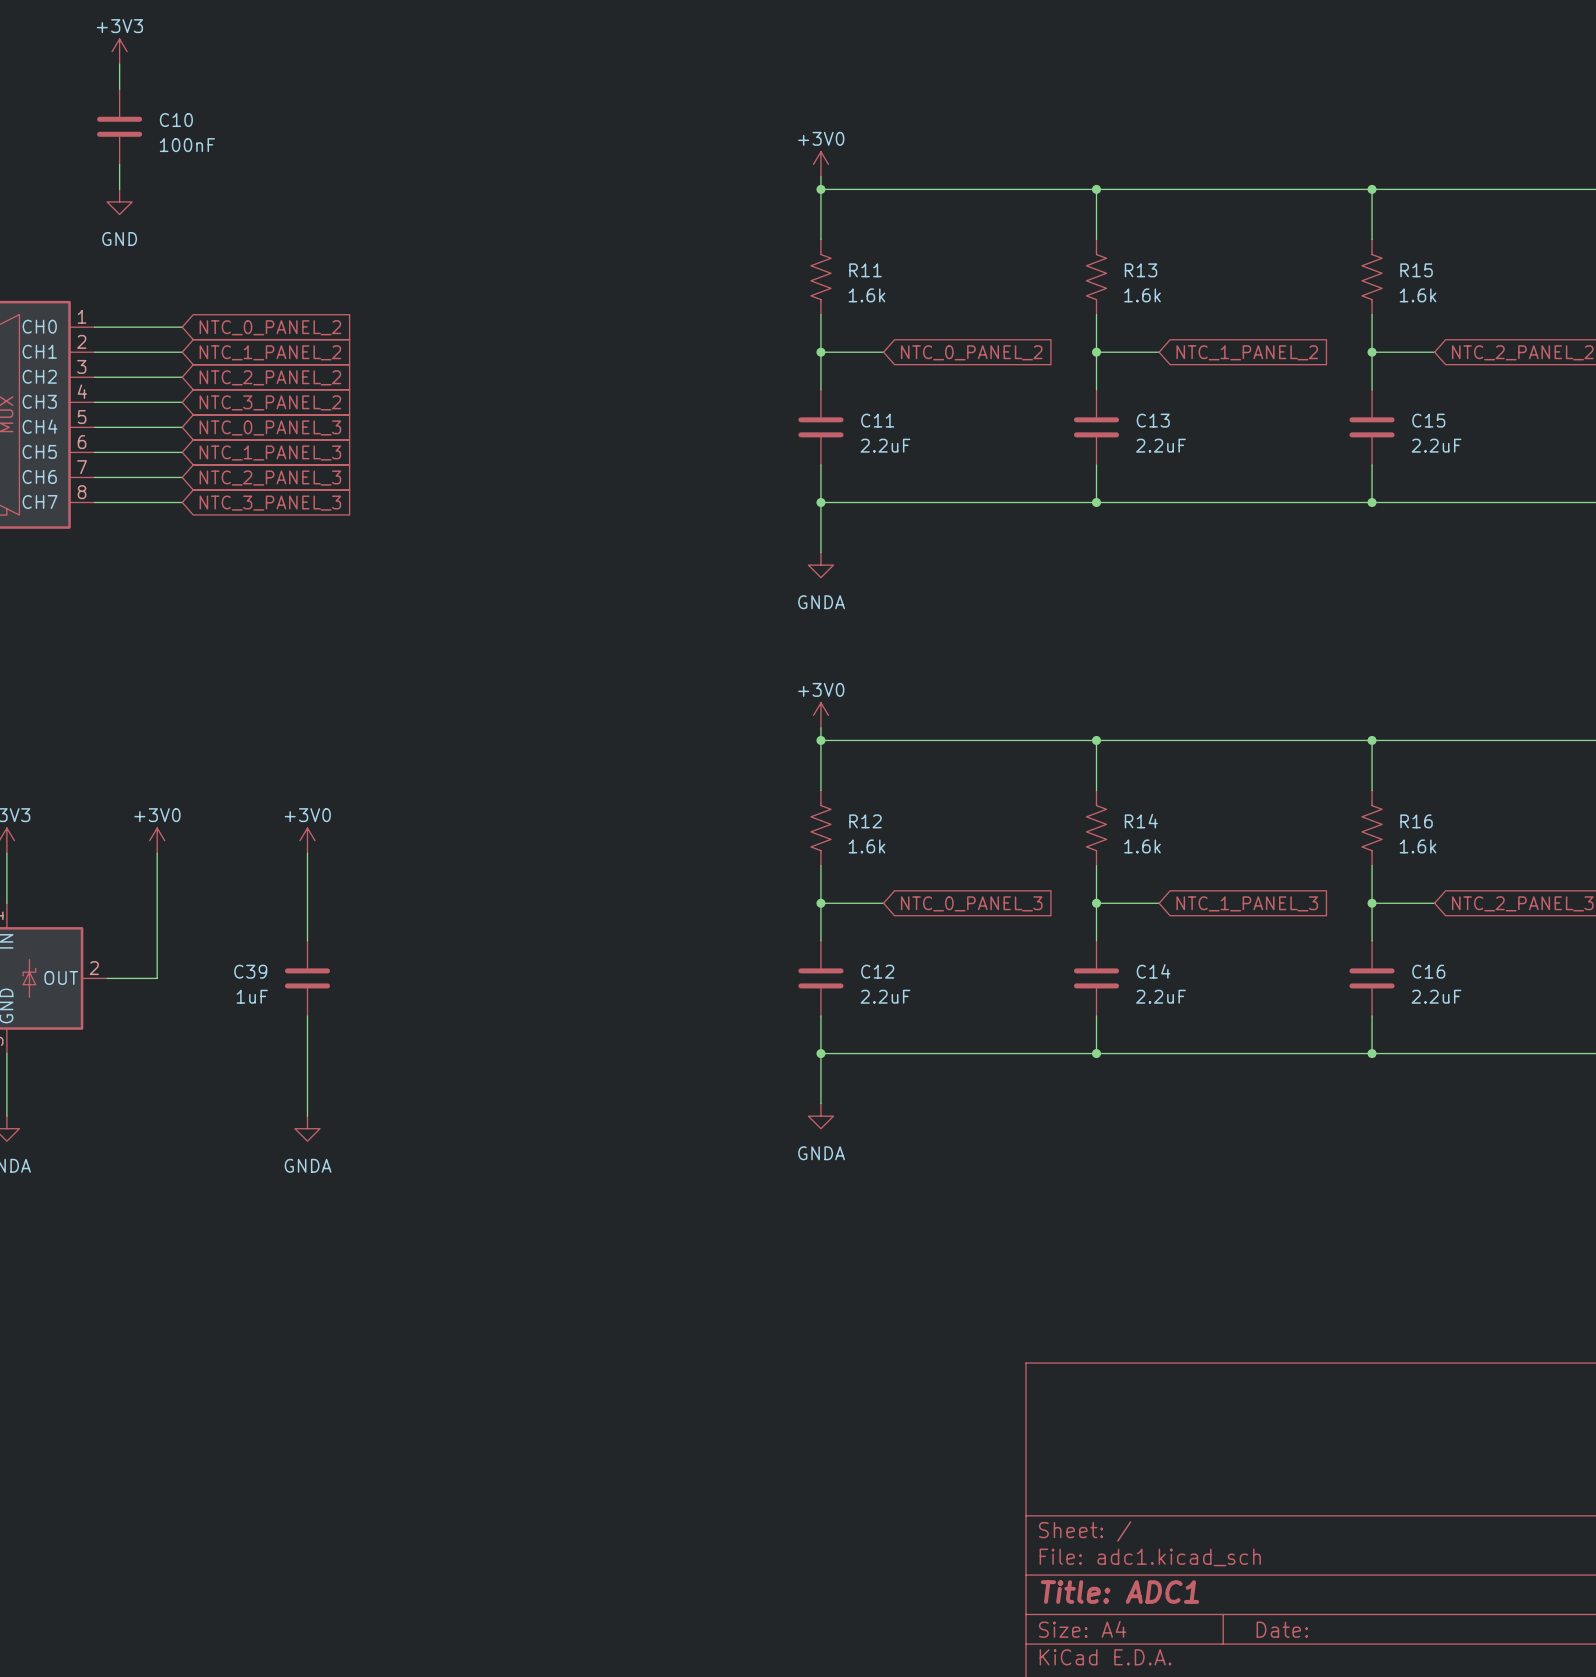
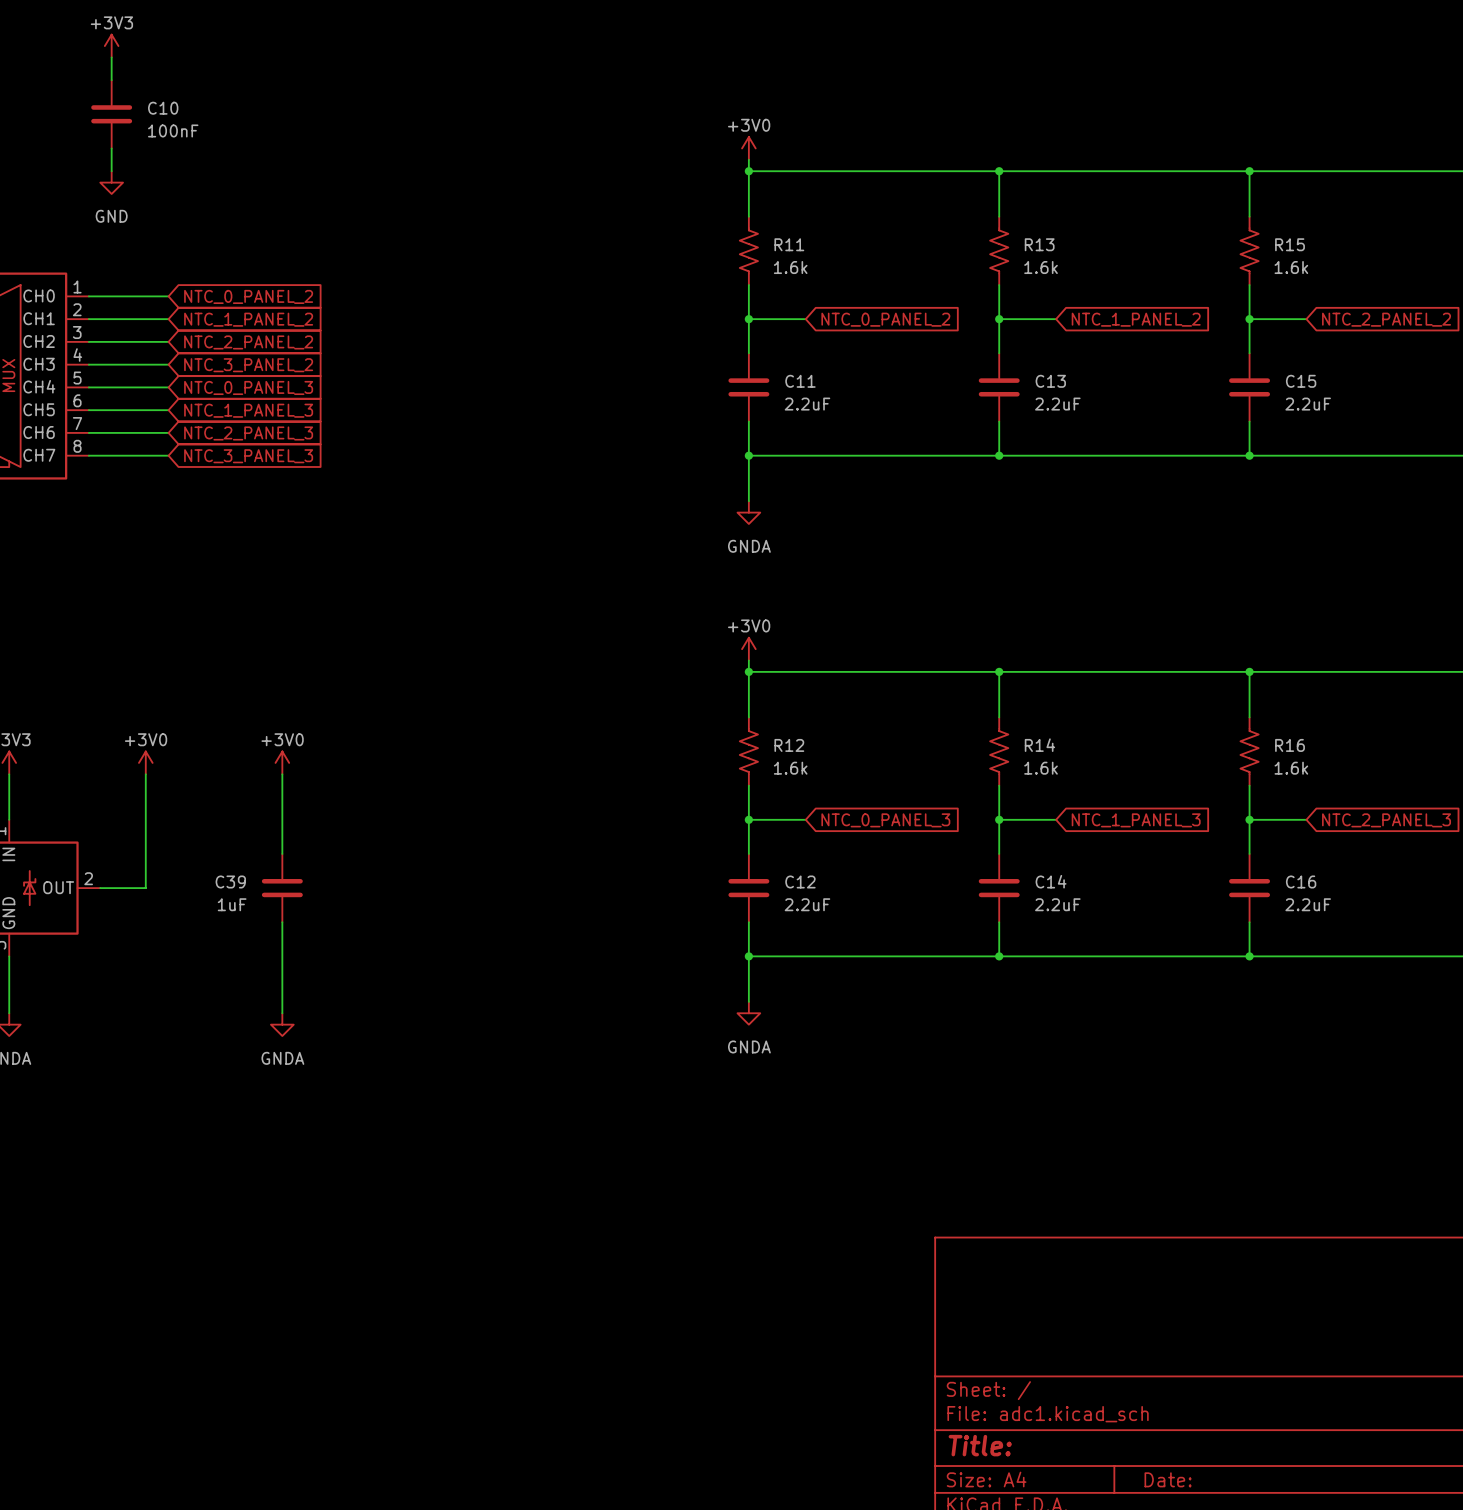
title block: Title: ADC1 (1119, 1592) -> Title: (980, 1445)

